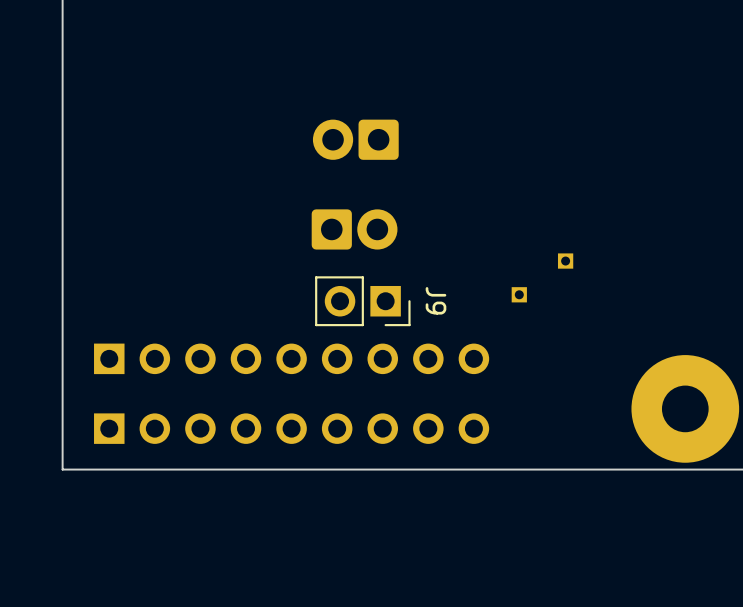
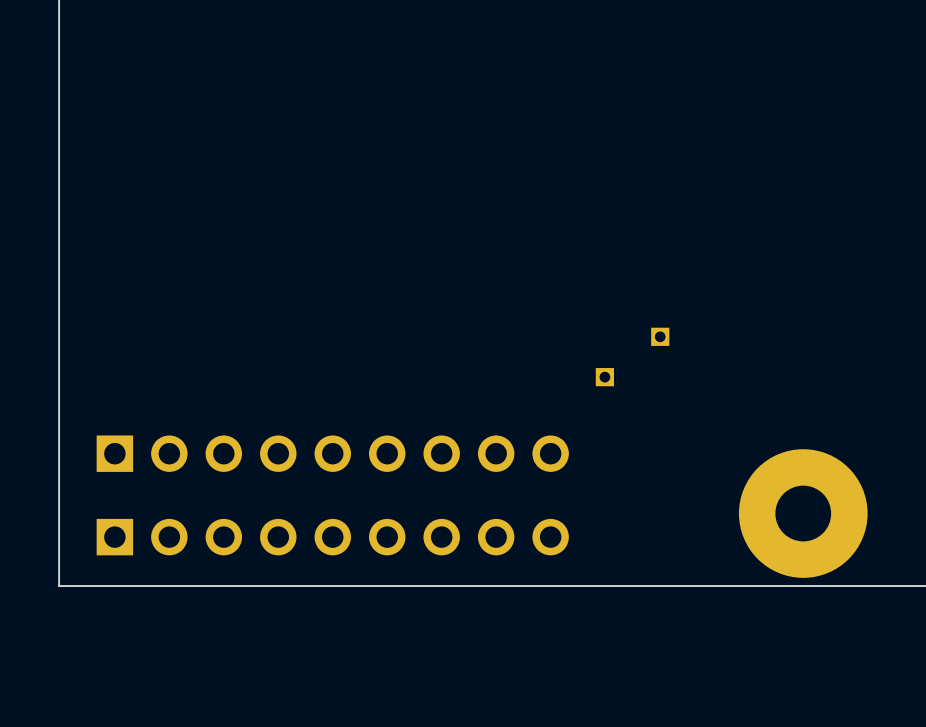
part: (355, 139) -> none
part: (354, 229) -> none
J9: (362, 301) -> none

